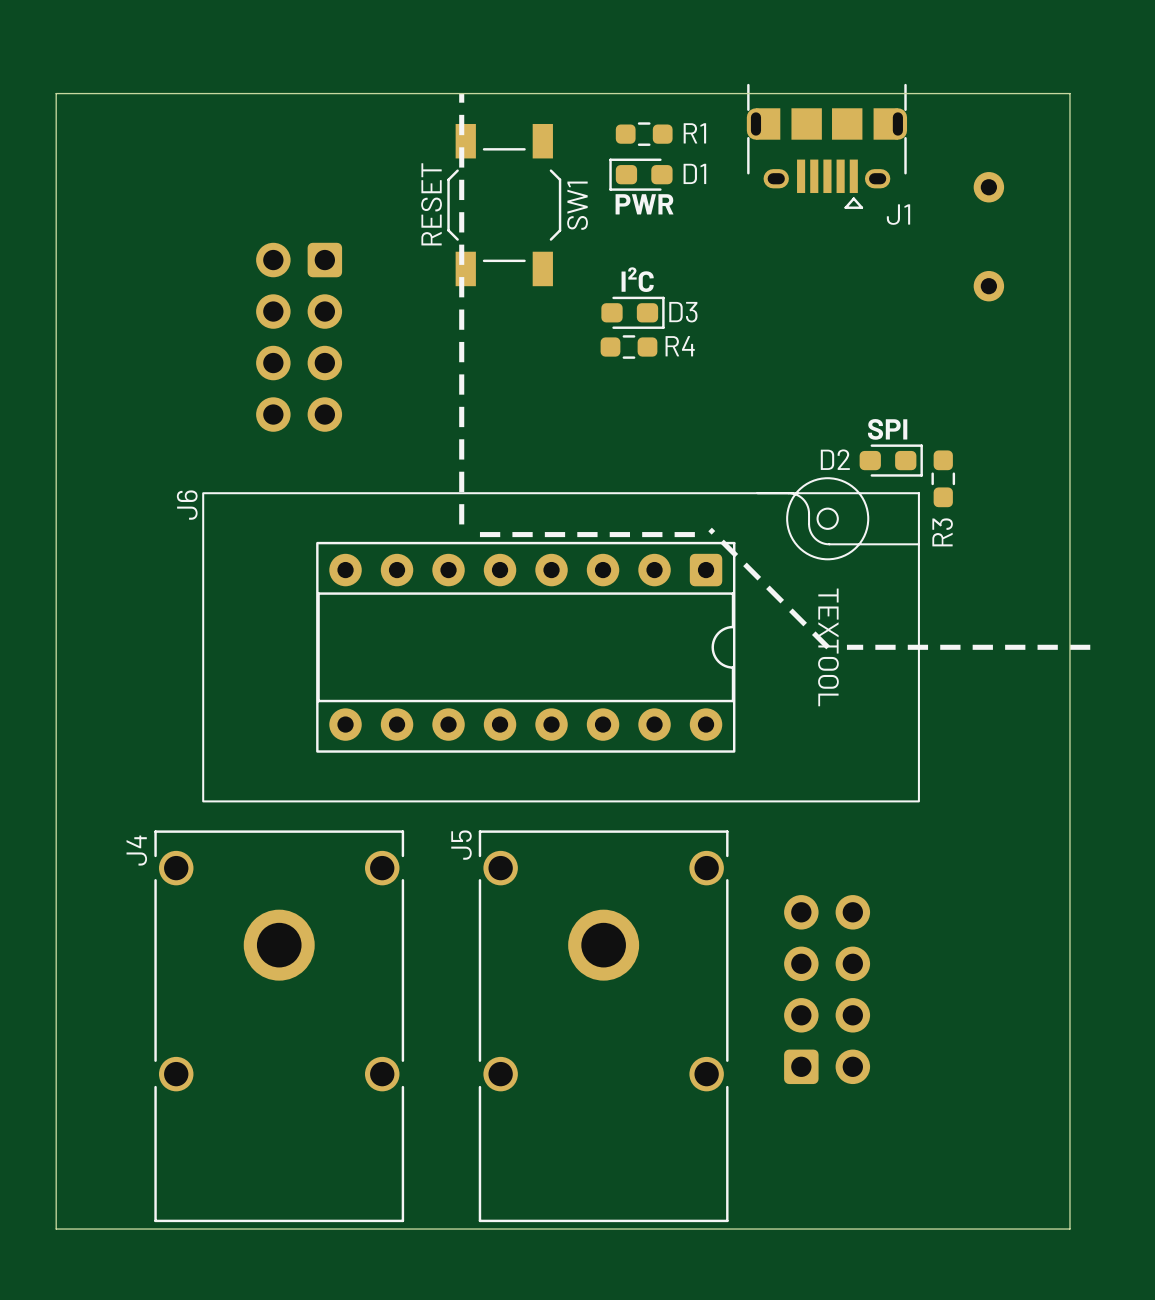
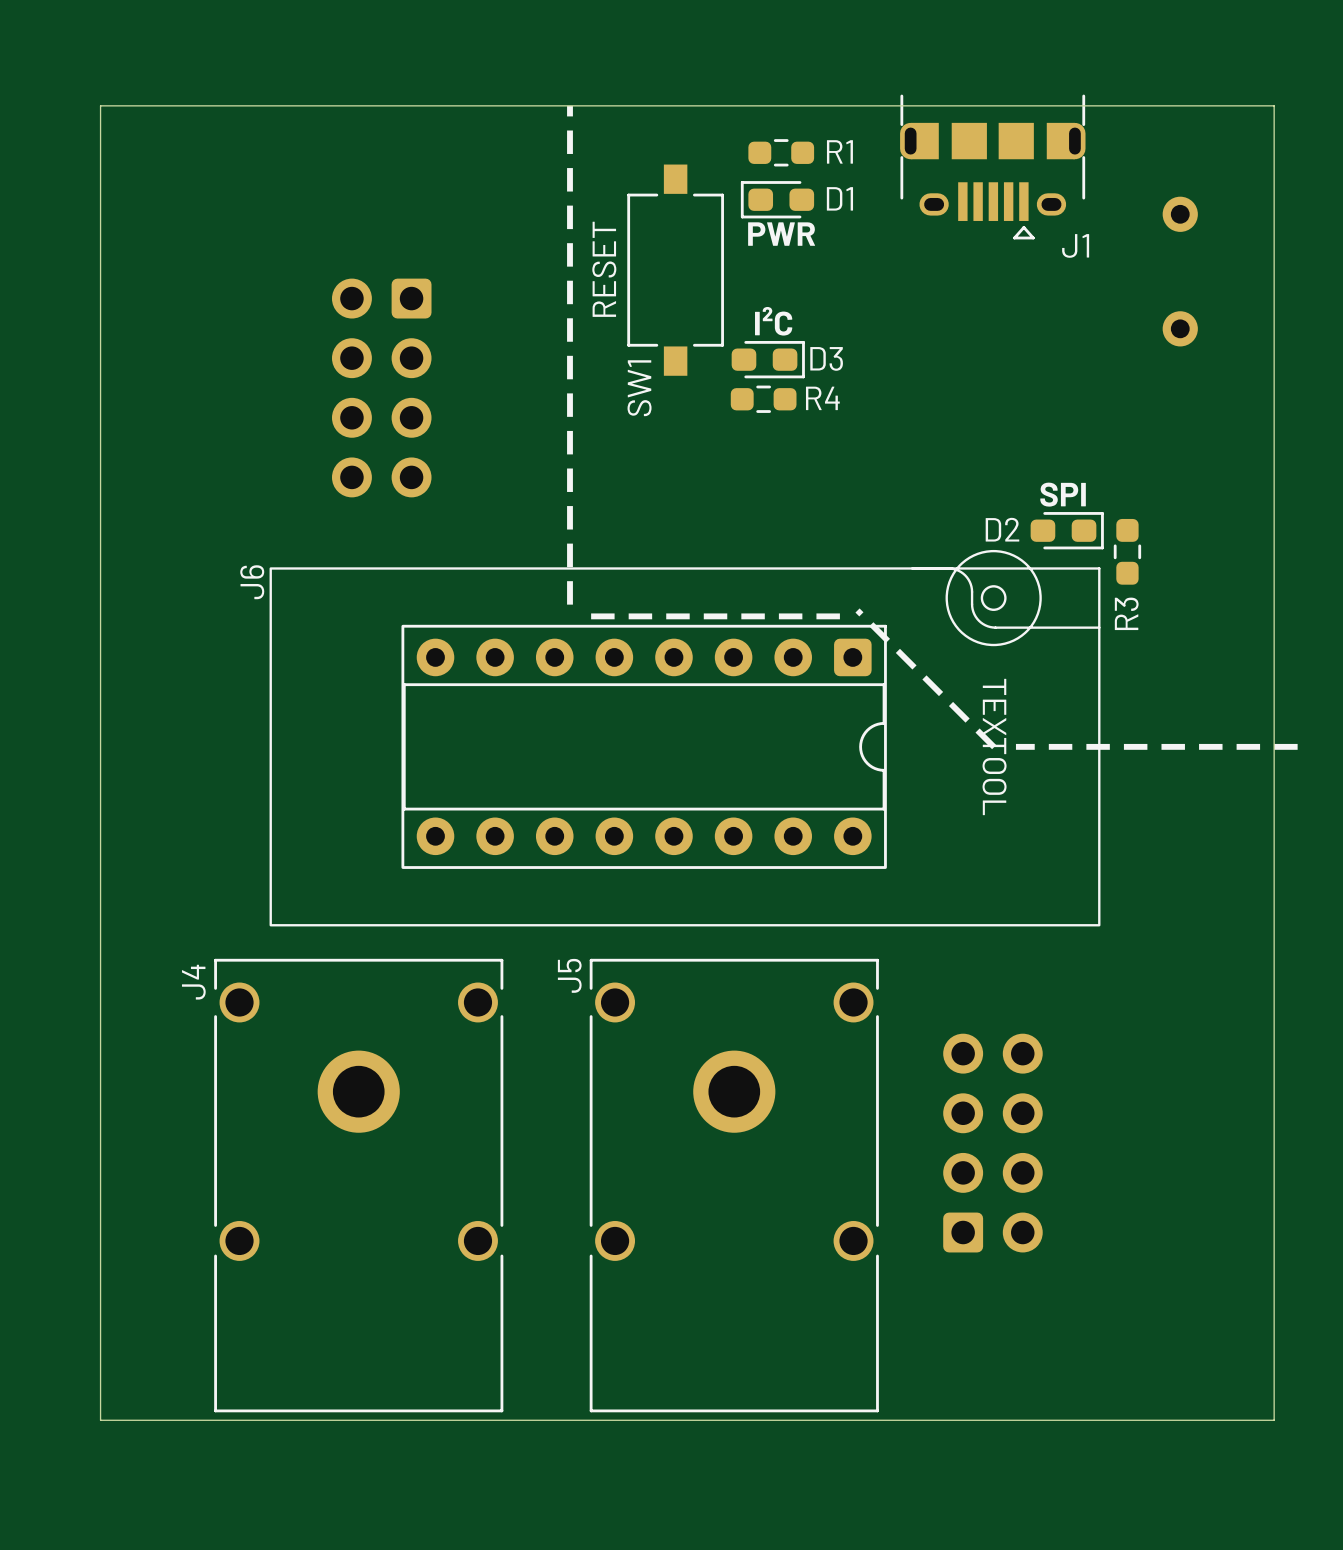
SW1 footprint: [447, 123, 562, 287] -> [627, 164, 724, 376]
SW1 name position: SW1 (577, 205) -> SW1 (639, 388)

